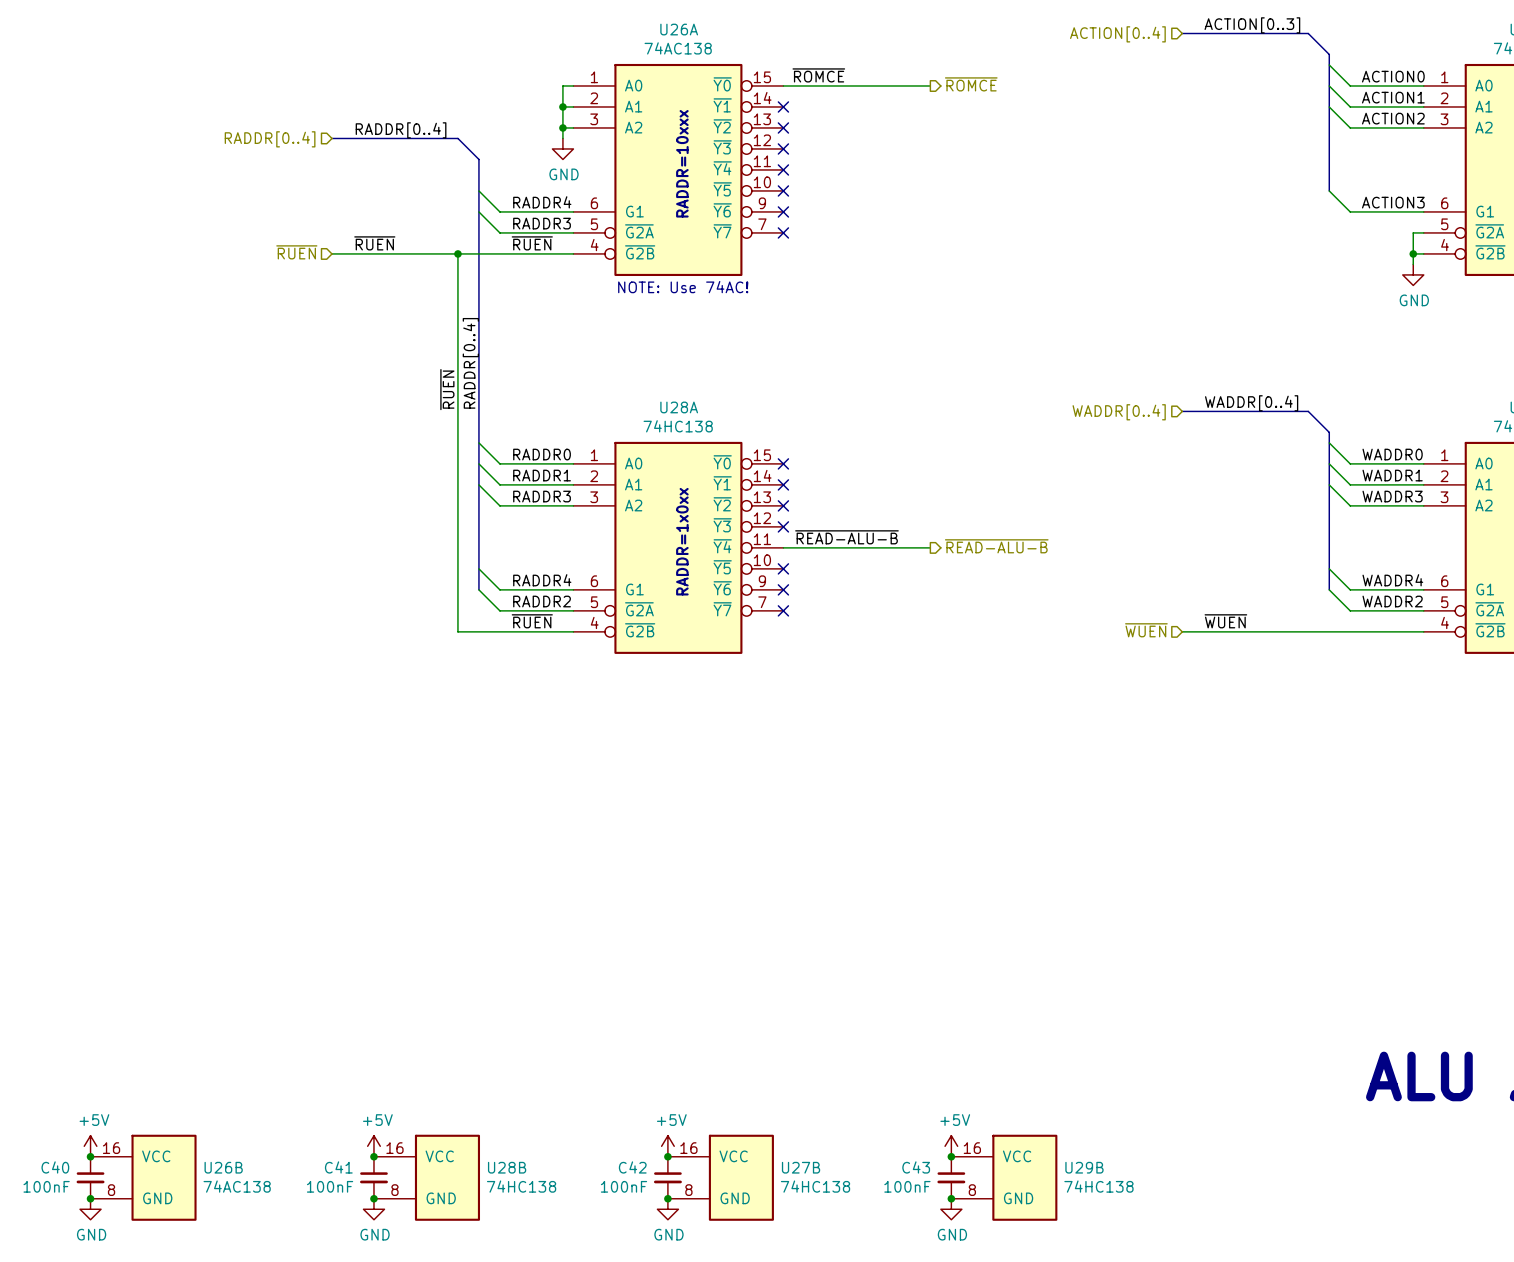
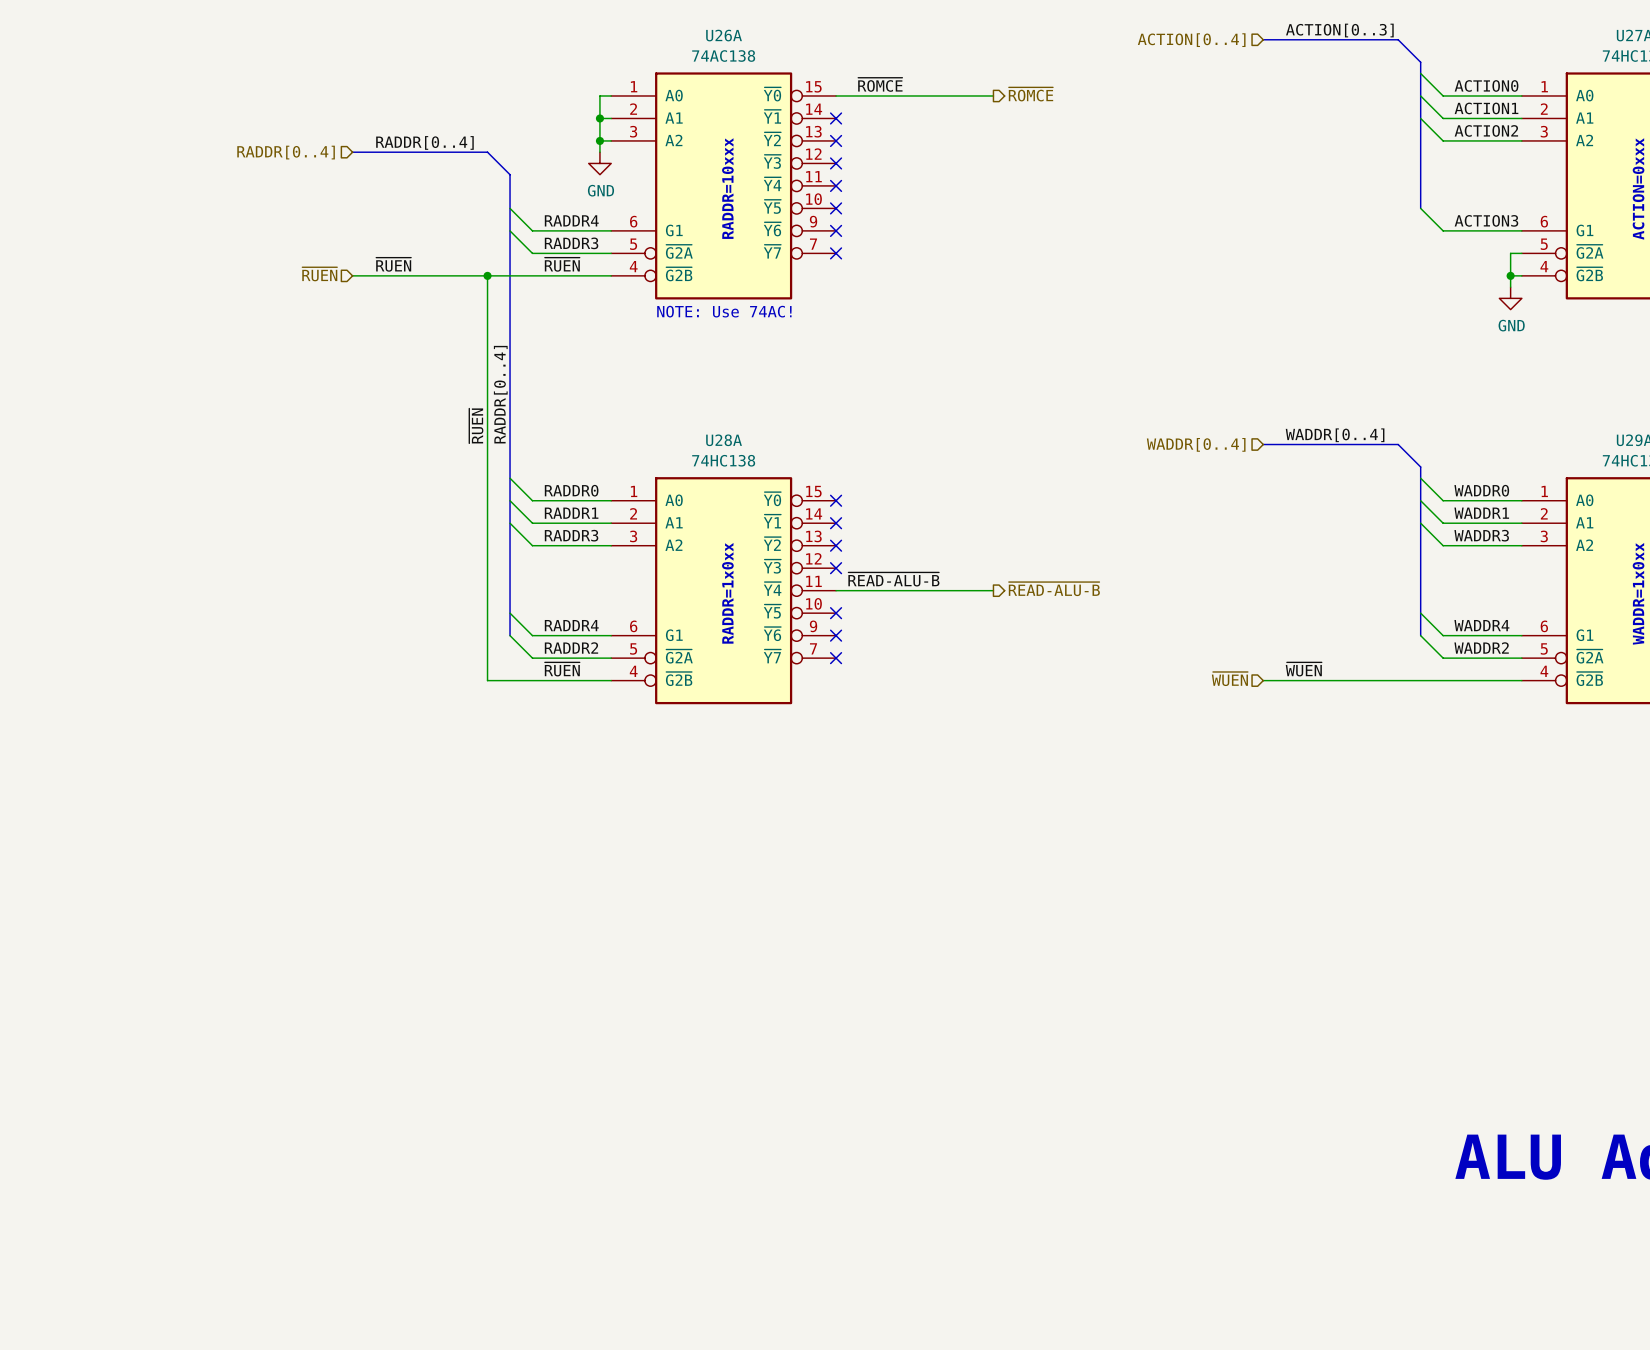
power symbol: +5V (90, 1146) -> none
power symbol: +5V (373, 1146) -> none
power symbol: +5V (667, 1146) -> none
power symbol: +5V (951, 1146) -> none
junction: (90, 1156) -> none
junction: (373, 1156) -> none
junction: (667, 1156) -> none
junction: (951, 1156) -> none
C40: 100nF (90, 1177) -> none
U26B: 74AC138 (143, 1177) -> none
C41: 100nF (373, 1177) -> none
U28B: 74HC138 (426, 1177) -> none
C42: 100nF (667, 1177) -> none
U27B: 74HC138 (720, 1177) -> none
C43: 100nF (951, 1177) -> none
U29B: 74HC138 (1004, 1177) -> none
junction: (90, 1198) -> none
junction: (373, 1198) -> none
junction: (667, 1198) -> none
junction: (951, 1198) -> none
power symbol: GND (90, 1209) -> none
power symbol: GND (373, 1209) -> none
power symbol: GND (667, 1209) -> none
power symbol: GND (951, 1209) -> none

